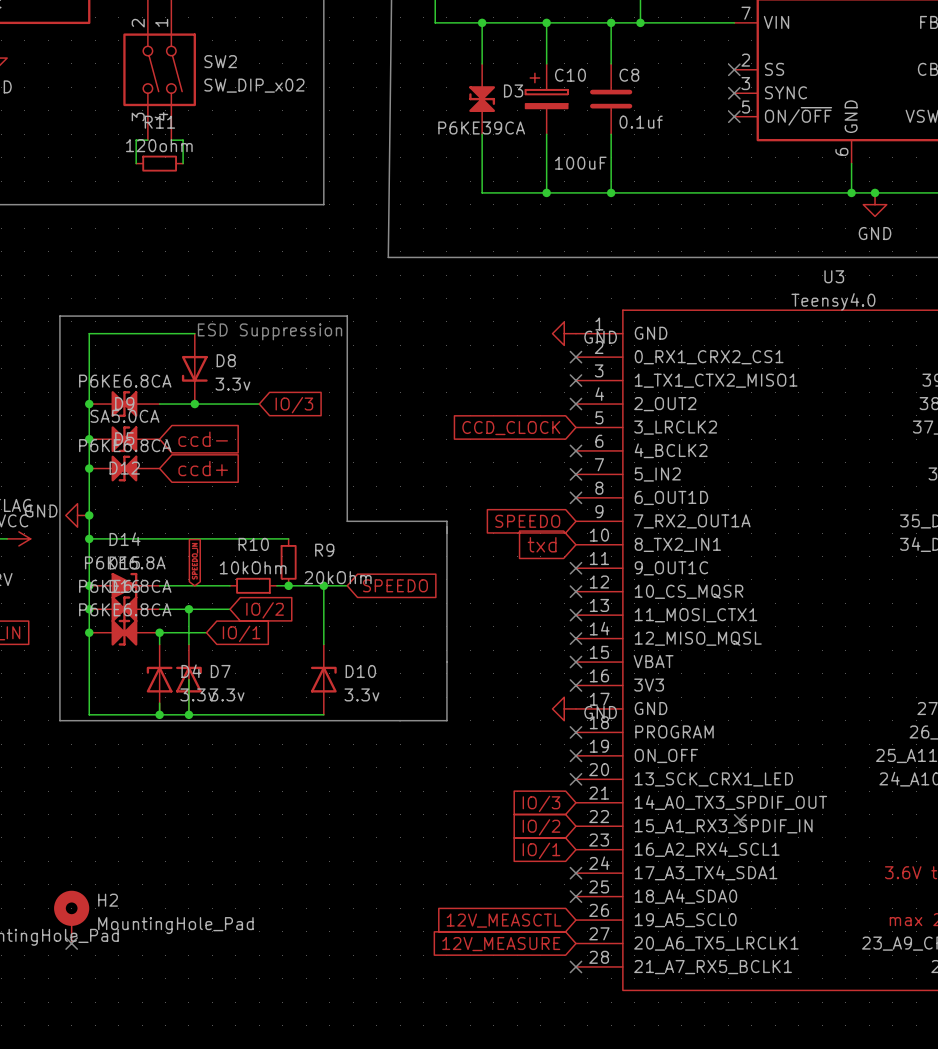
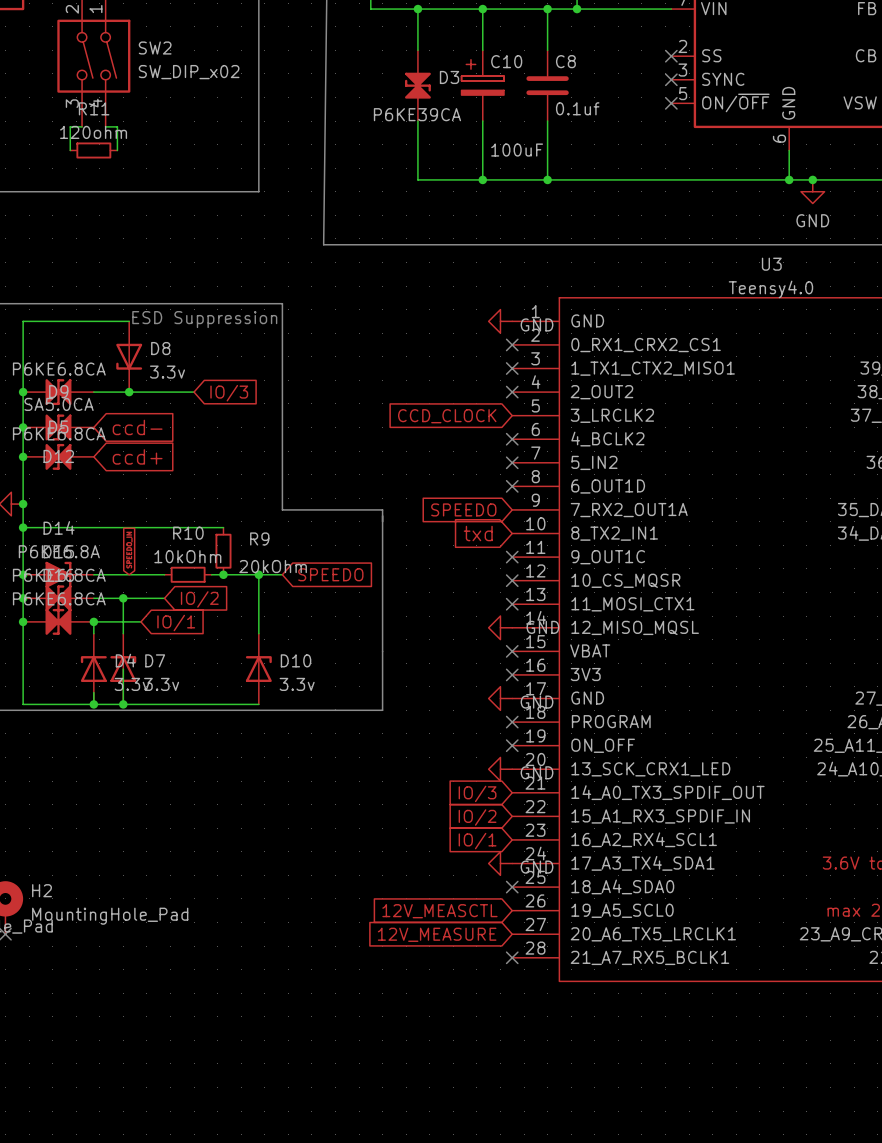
power symbol: none -> GND (500, 627)
no-connect mark: (575, 638) -> none
power symbol: none -> GND (500, 769)
no-connect mark: (575, 779) -> none
no-connect mark: (740, 820) -> none
power symbol: none -> GND (500, 863)
no-connect mark: (575, 873) -> none

